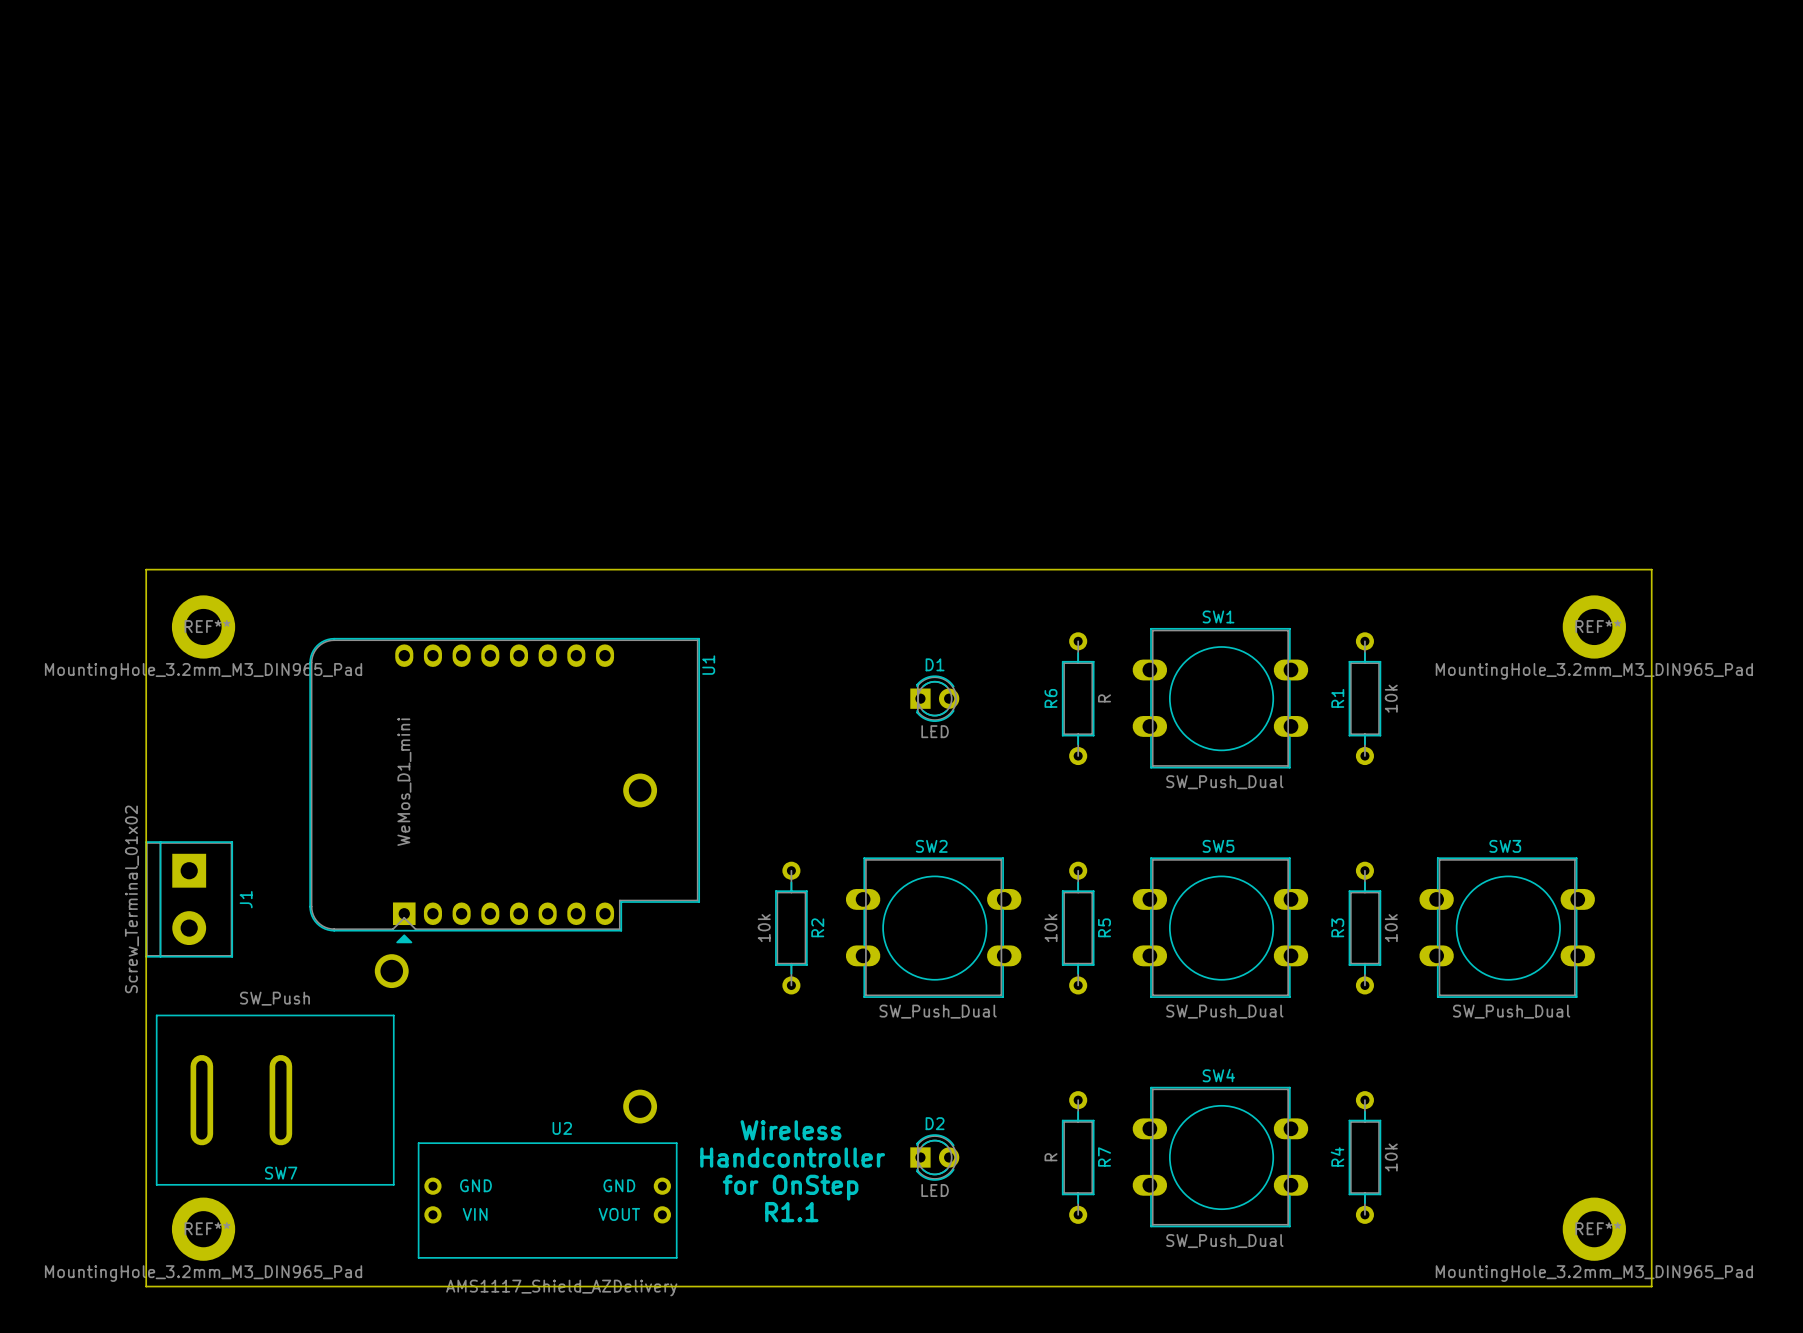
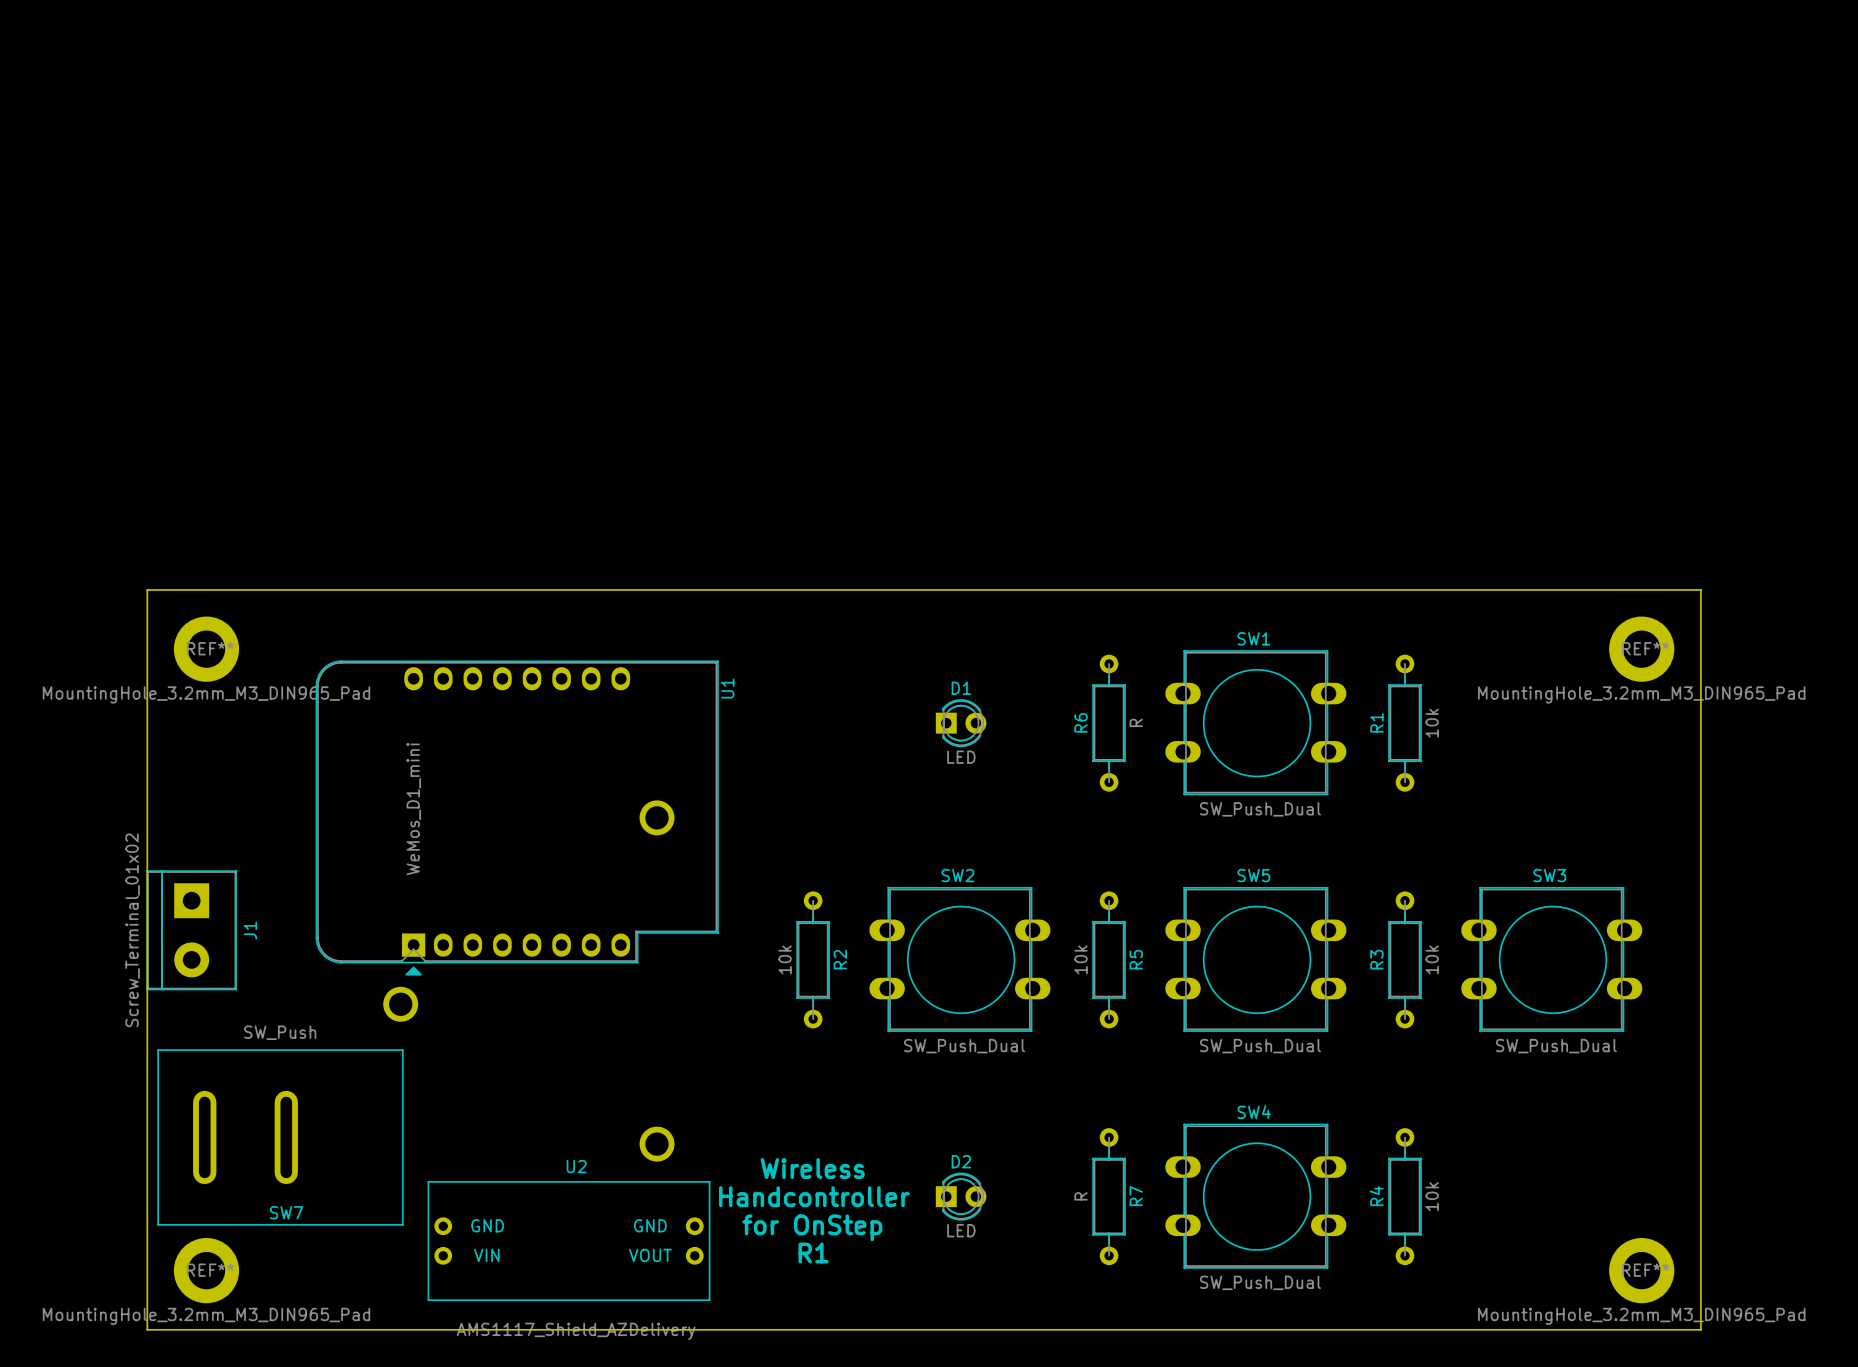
U2 footprint: [417, 1142, 678, 1259] -> [427, 1181, 711, 1301]
text: R1.1 (791, 1212) -> R1 (813, 1252)

